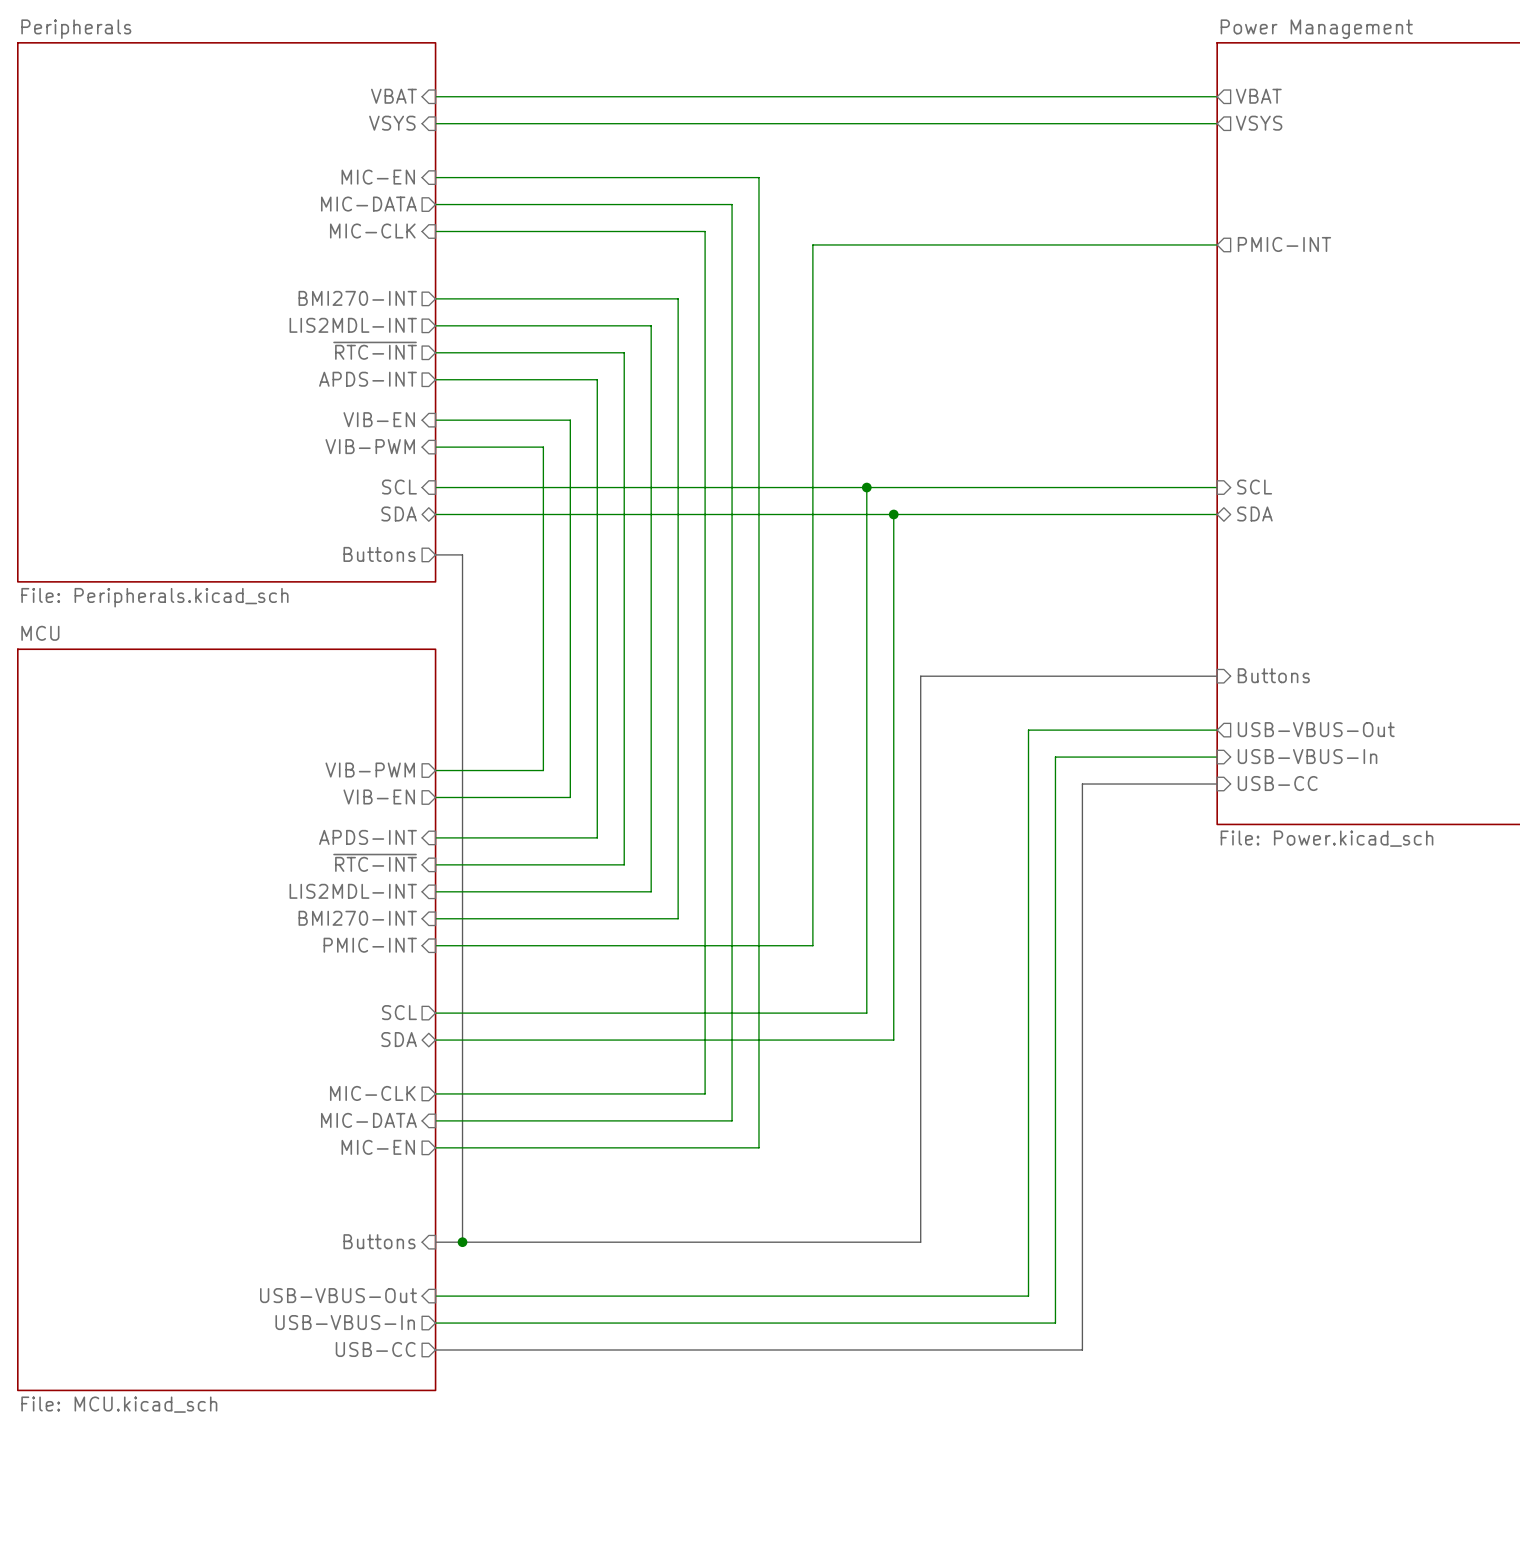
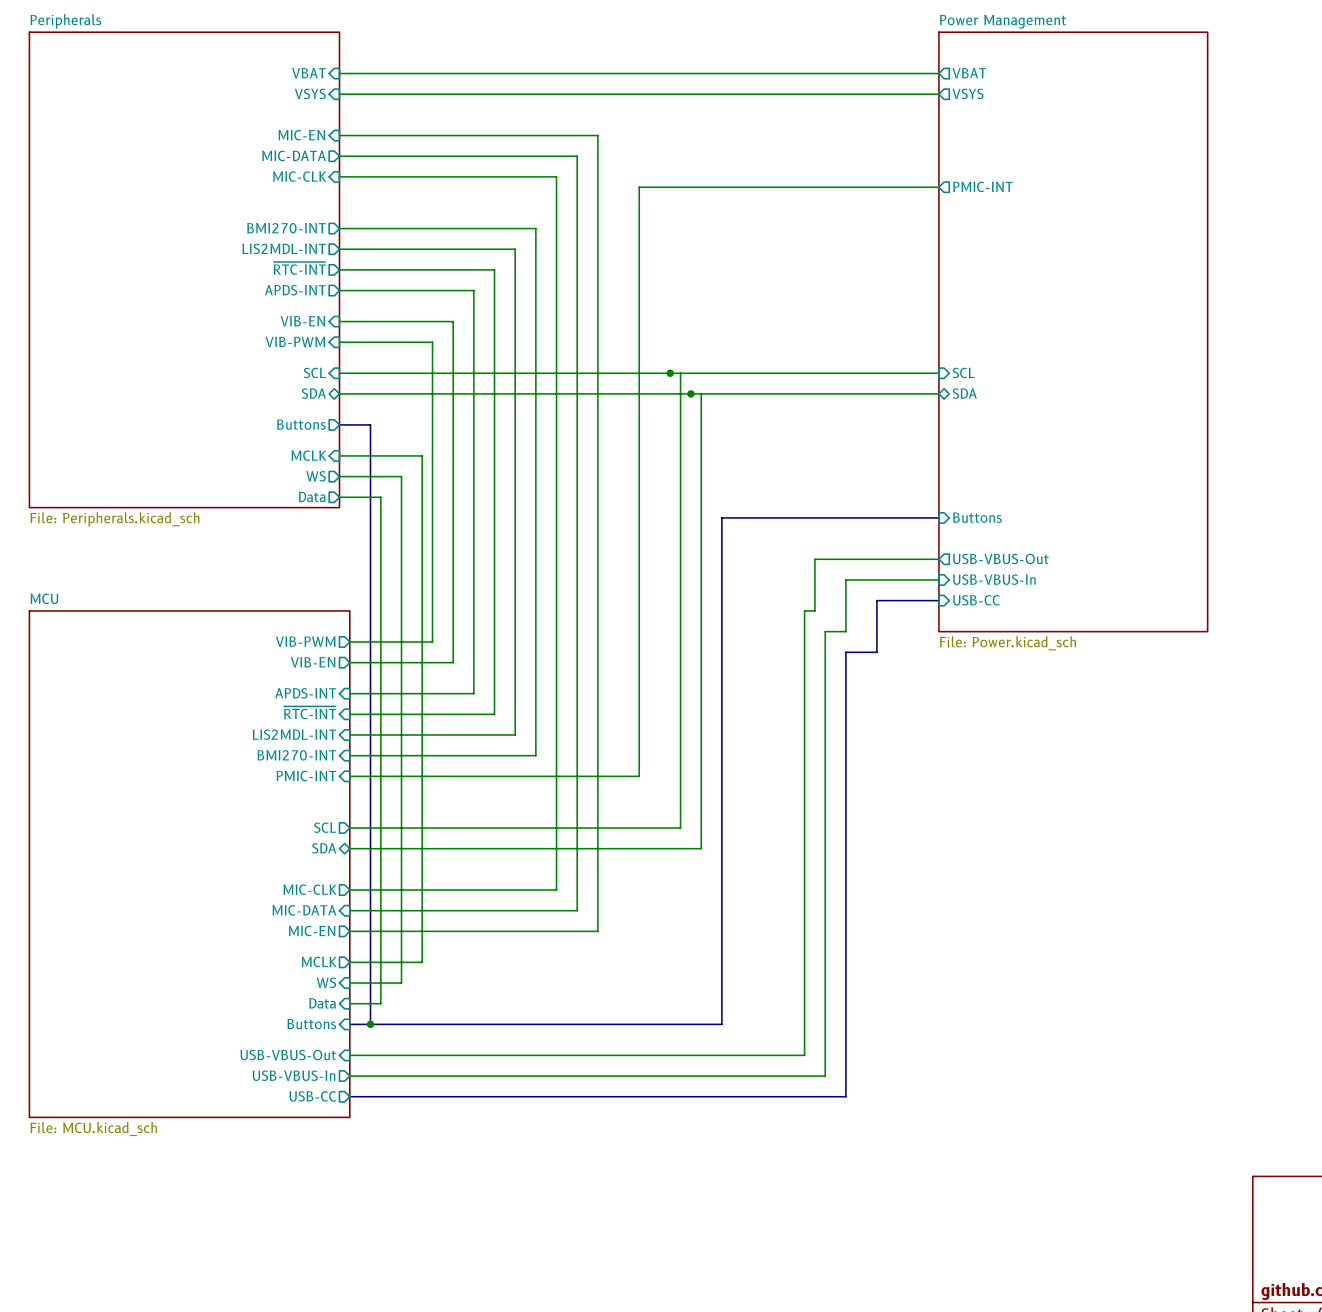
wire: (758, 177) (758, 1147) (435, 1147) -> (587, 135) (597, 135) (597, 931) (349, 931)
wire: (732, 204) (732, 1120) (435, 1120) -> (566, 156) (577, 156) (577, 910) (349, 910)
wire: (705, 231) (705, 1093) (435, 1093) -> (546, 176) (556, 176) (556, 890) (349, 890)
wire: (826, 244) (812, 244) (812, 945) (435, 945) -> none
wire: (678, 298) (678, 918) (435, 918) -> (525, 228) (535, 228) (535, 755) (349, 755)
sheet Peripherals: File: Peripherals.kicad_sch (226, 312) -> none
wire: (651, 325) (651, 891) (435, 891) -> (504, 249) (515, 249) (515, 734) (349, 734)
sheet Peripherals: none -> File: Peripherals.kicad_sch (184, 269)
wire: (624, 352) (624, 864) (583, 864) -> (442, 321) (453, 321) (453, 662)
wire: none -> (484, 269) (494, 269) (494, 714) (349, 714)
wire: (597, 379) (597, 837) (556, 837) -> (422, 342) (432, 342) (432, 641)
wire: none -> (463, 290) (473, 290) (473, 693) (349, 693)
wire: (570, 420) (570, 797) (435, 797) -> none
wire: (543, 447) (543, 595) -> (339, 455) (422, 455)
wire: (866, 487) (866, 1013) (826, 1013) -> (639, 187) (639, 776)
wire: none -> (680, 373) (680, 828) (349, 828)
wire: (893, 514) (893, 1040) (435, 1040) -> none
wire: none -> (701, 393) (701, 848) (349, 848)
bus: (462, 554) (462, 1242) -> (360, 424) (370, 424) (370, 1024)
sheet pin: none -> MCLK (308, 455)
sheet pin: none -> WS (316, 476)
wire: none -> (339, 476) (401, 476) (401, 983) (349, 983)
sheet pin: none -> Data (312, 496)
wire: none -> (339, 497) (380, 497) (380, 1003) (349, 1003)
bus: (934, 676) (920, 676) (920, 1242) (435, 1242) -> (721, 517) (721, 1024) (349, 1024)
wire: (1055, 730) (1028, 730) (1028, 1296) (435, 1296) -> none
wire: (1055, 757) (1095, 757) -> (814, 579) (814, 559)
wire: none -> (845, 579) (845, 631) (825, 631) (825, 1076) (349, 1076)
sheet pin position: VIB-PWM (370, 770) -> VIB-PWM (305, 641)
wire: (435, 770) (543, 770) -> (349, 962) (422, 962) (422, 590)
bus: (1136, 784) (1082, 784) (1082, 1349) (435, 1349) -> (876, 600) (876, 652) (845, 652) (845, 1096) (349, 1096)
sheet pin position: VIB-EN (379, 796) -> VIB-EN (313, 662)
wire: (1055, 797) (1055, 1323) (435, 1323) -> (814, 610) (804, 610) (804, 1055) (349, 1055)
sheet pin position: APDS-INT (367, 837) -> APDS-INT (305, 693)
wire: (435, 837) (449, 837) -> none
sheet pin position: ~{RTC-INT} (375, 862) -> ~{RTC-INT} (310, 712)
wire: (435, 864) (449, 864) -> none
sheet pin position: LIS2MDL-INT (353, 891) -> LIS2MDL-INT (294, 734)
sheet pin position: BMI270-INT (357, 918) -> BMI270-INT (296, 755)
sheet pin position: PMIC-INT (370, 945) -> PMIC-INT (306, 776)
sheet pin position: SCL (399, 1012) -> SCL (325, 827)
wire: (435, 1013) (449, 1013) -> none
sheet MCU: File: MCU.kicad_sch (226, 1019) -> none
sheet pin position: SDA (399, 1039) -> SDA (324, 848)
sheet pin position: MIC-CLK (372, 1093) -> MIC-CLK (310, 889)
sheet pin position: MIC-DATA (368, 1120) -> MIC-DATA (304, 910)
sheet MCU: none -> File: MCU.kicad_sch (189, 864)
sheet pin position: MIC-EN (378, 1147) -> MIC-EN (312, 931)
sheet pin position: Buttons (379, 1241) -> Buttons (311, 1024)
junction: (462, 1242) -> none
sheet pin: none -> MCLK (319, 962)
sheet pin: none -> WS (326, 982)
sheet pin position: USB-VBUS-Out (338, 1295) -> USB-VBUS-Out (288, 1055)
sheet pin: none -> Data (322, 1003)
sheet pin position: USB-VBUS-In (345, 1322) -> USB-VBUS-In (294, 1075)
junction: none -> (370, 1024)
sheet pin position: USB-CC (375, 1349) -> USB-CC (312, 1096)

